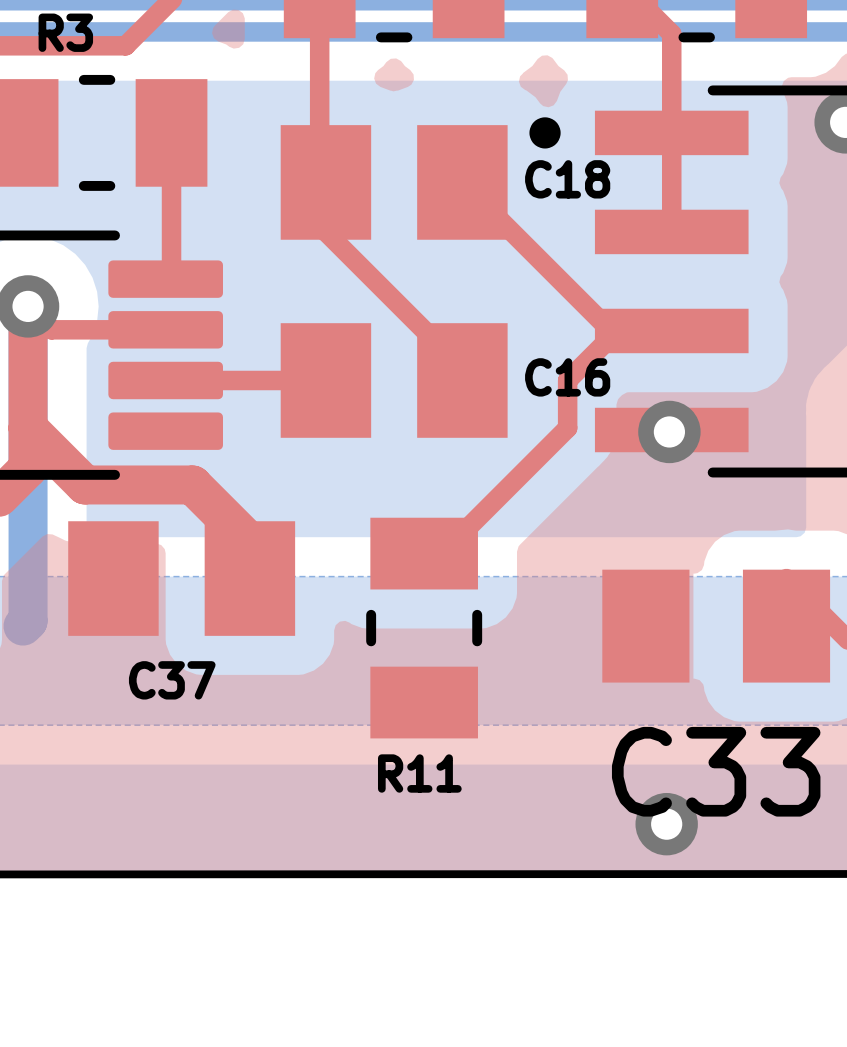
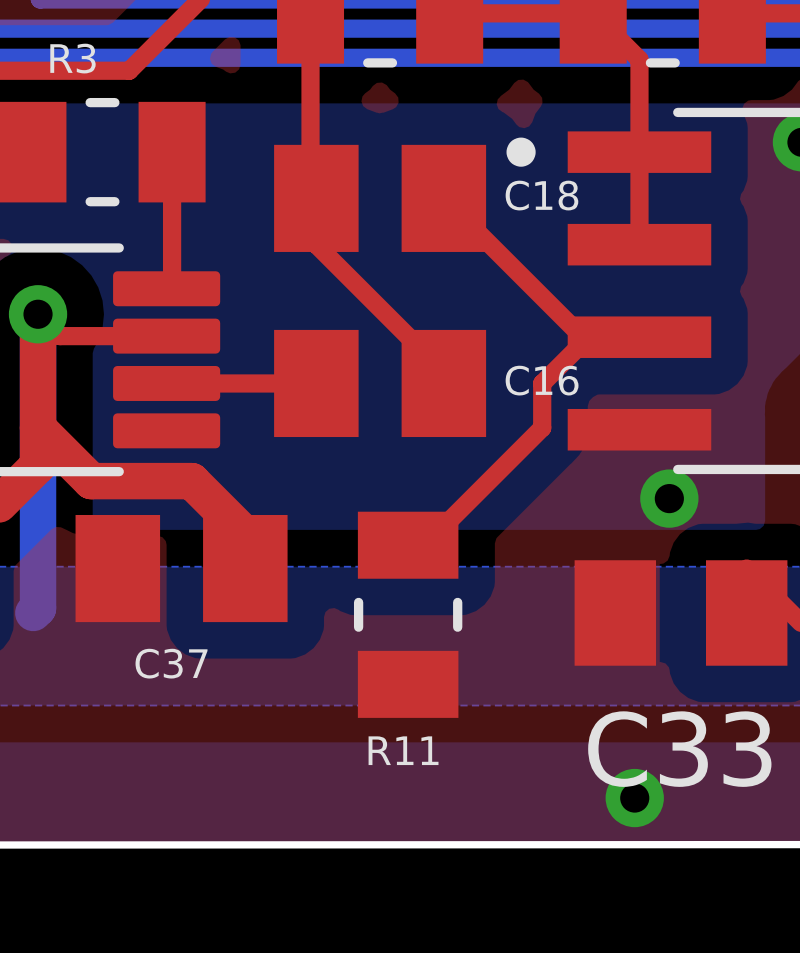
via position: (669, 431) -> (669, 498)

